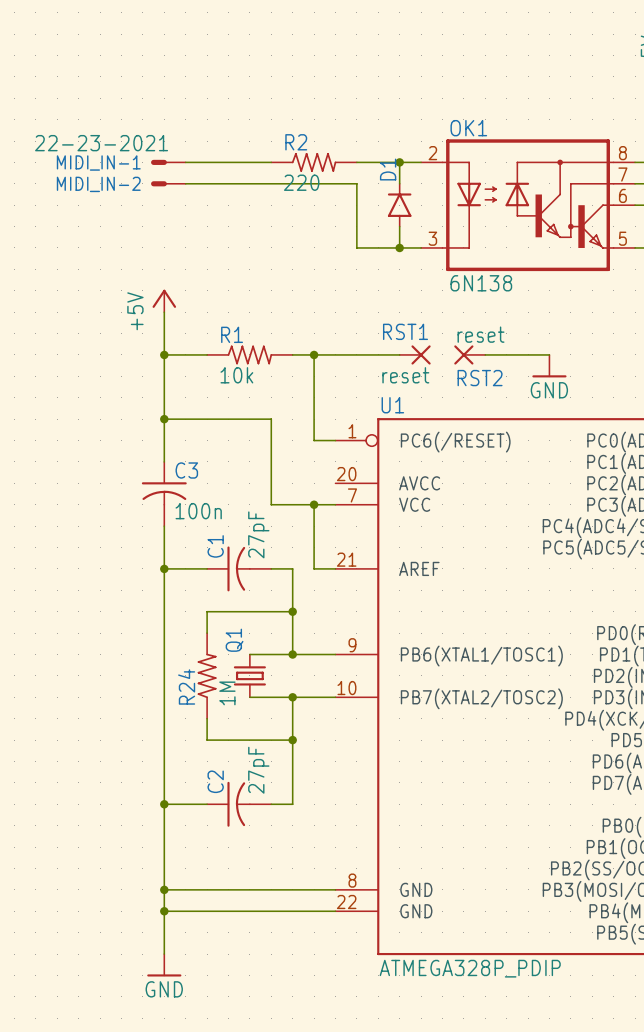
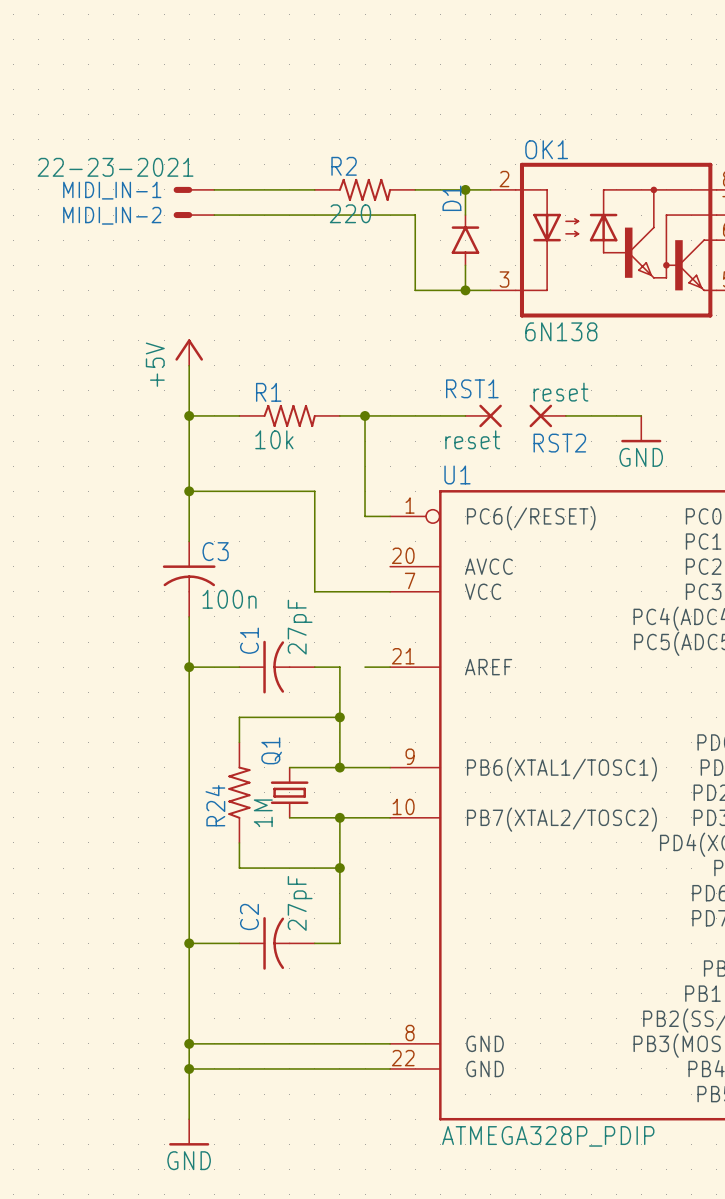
wire: (314, 504) (314, 568) -> none
junction: (314, 504) -> none

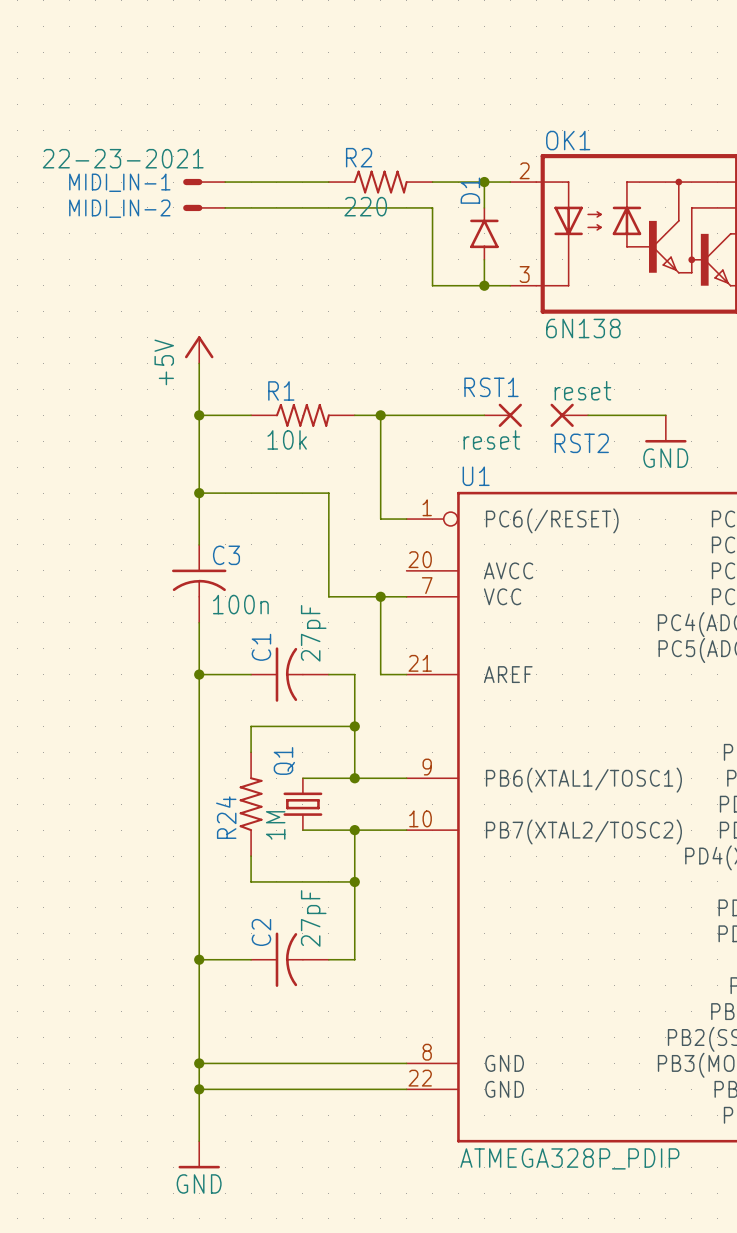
wire: none -> (380, 596) (380, 674)
junction: none -> (380, 596)

